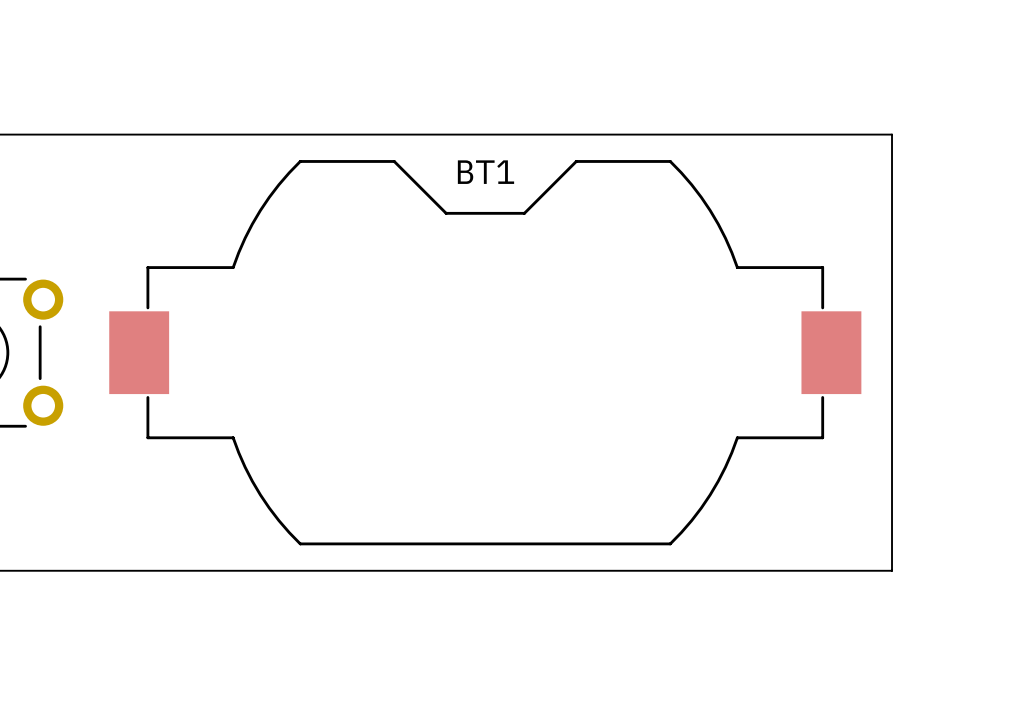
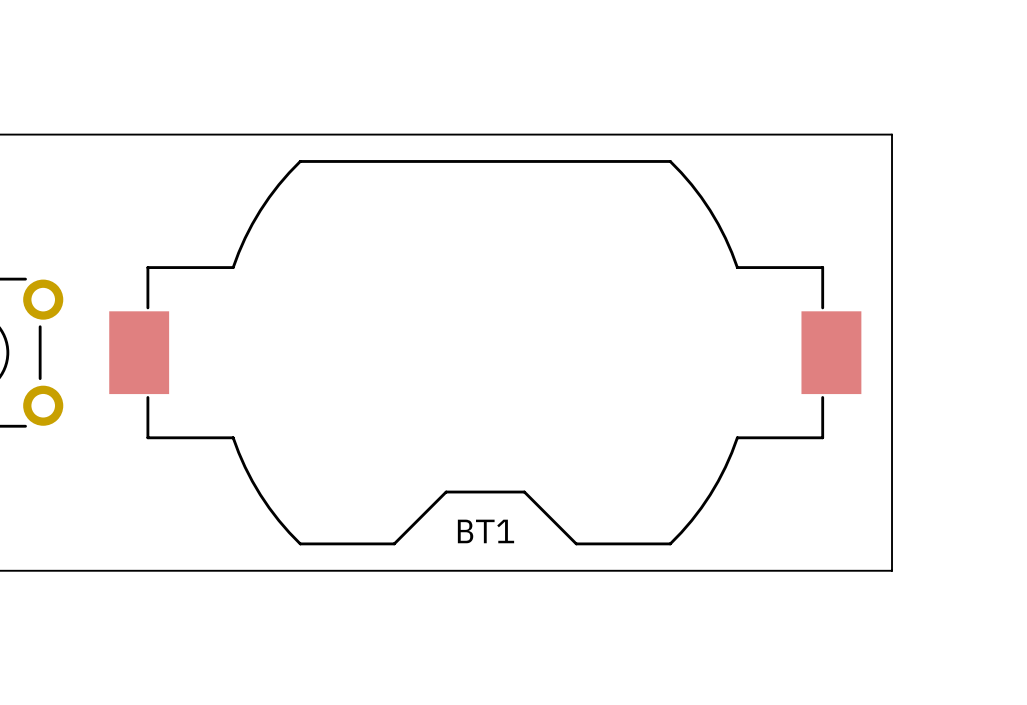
BT1 rotation: 0° (485, 352) -> 180° (485, 352)

